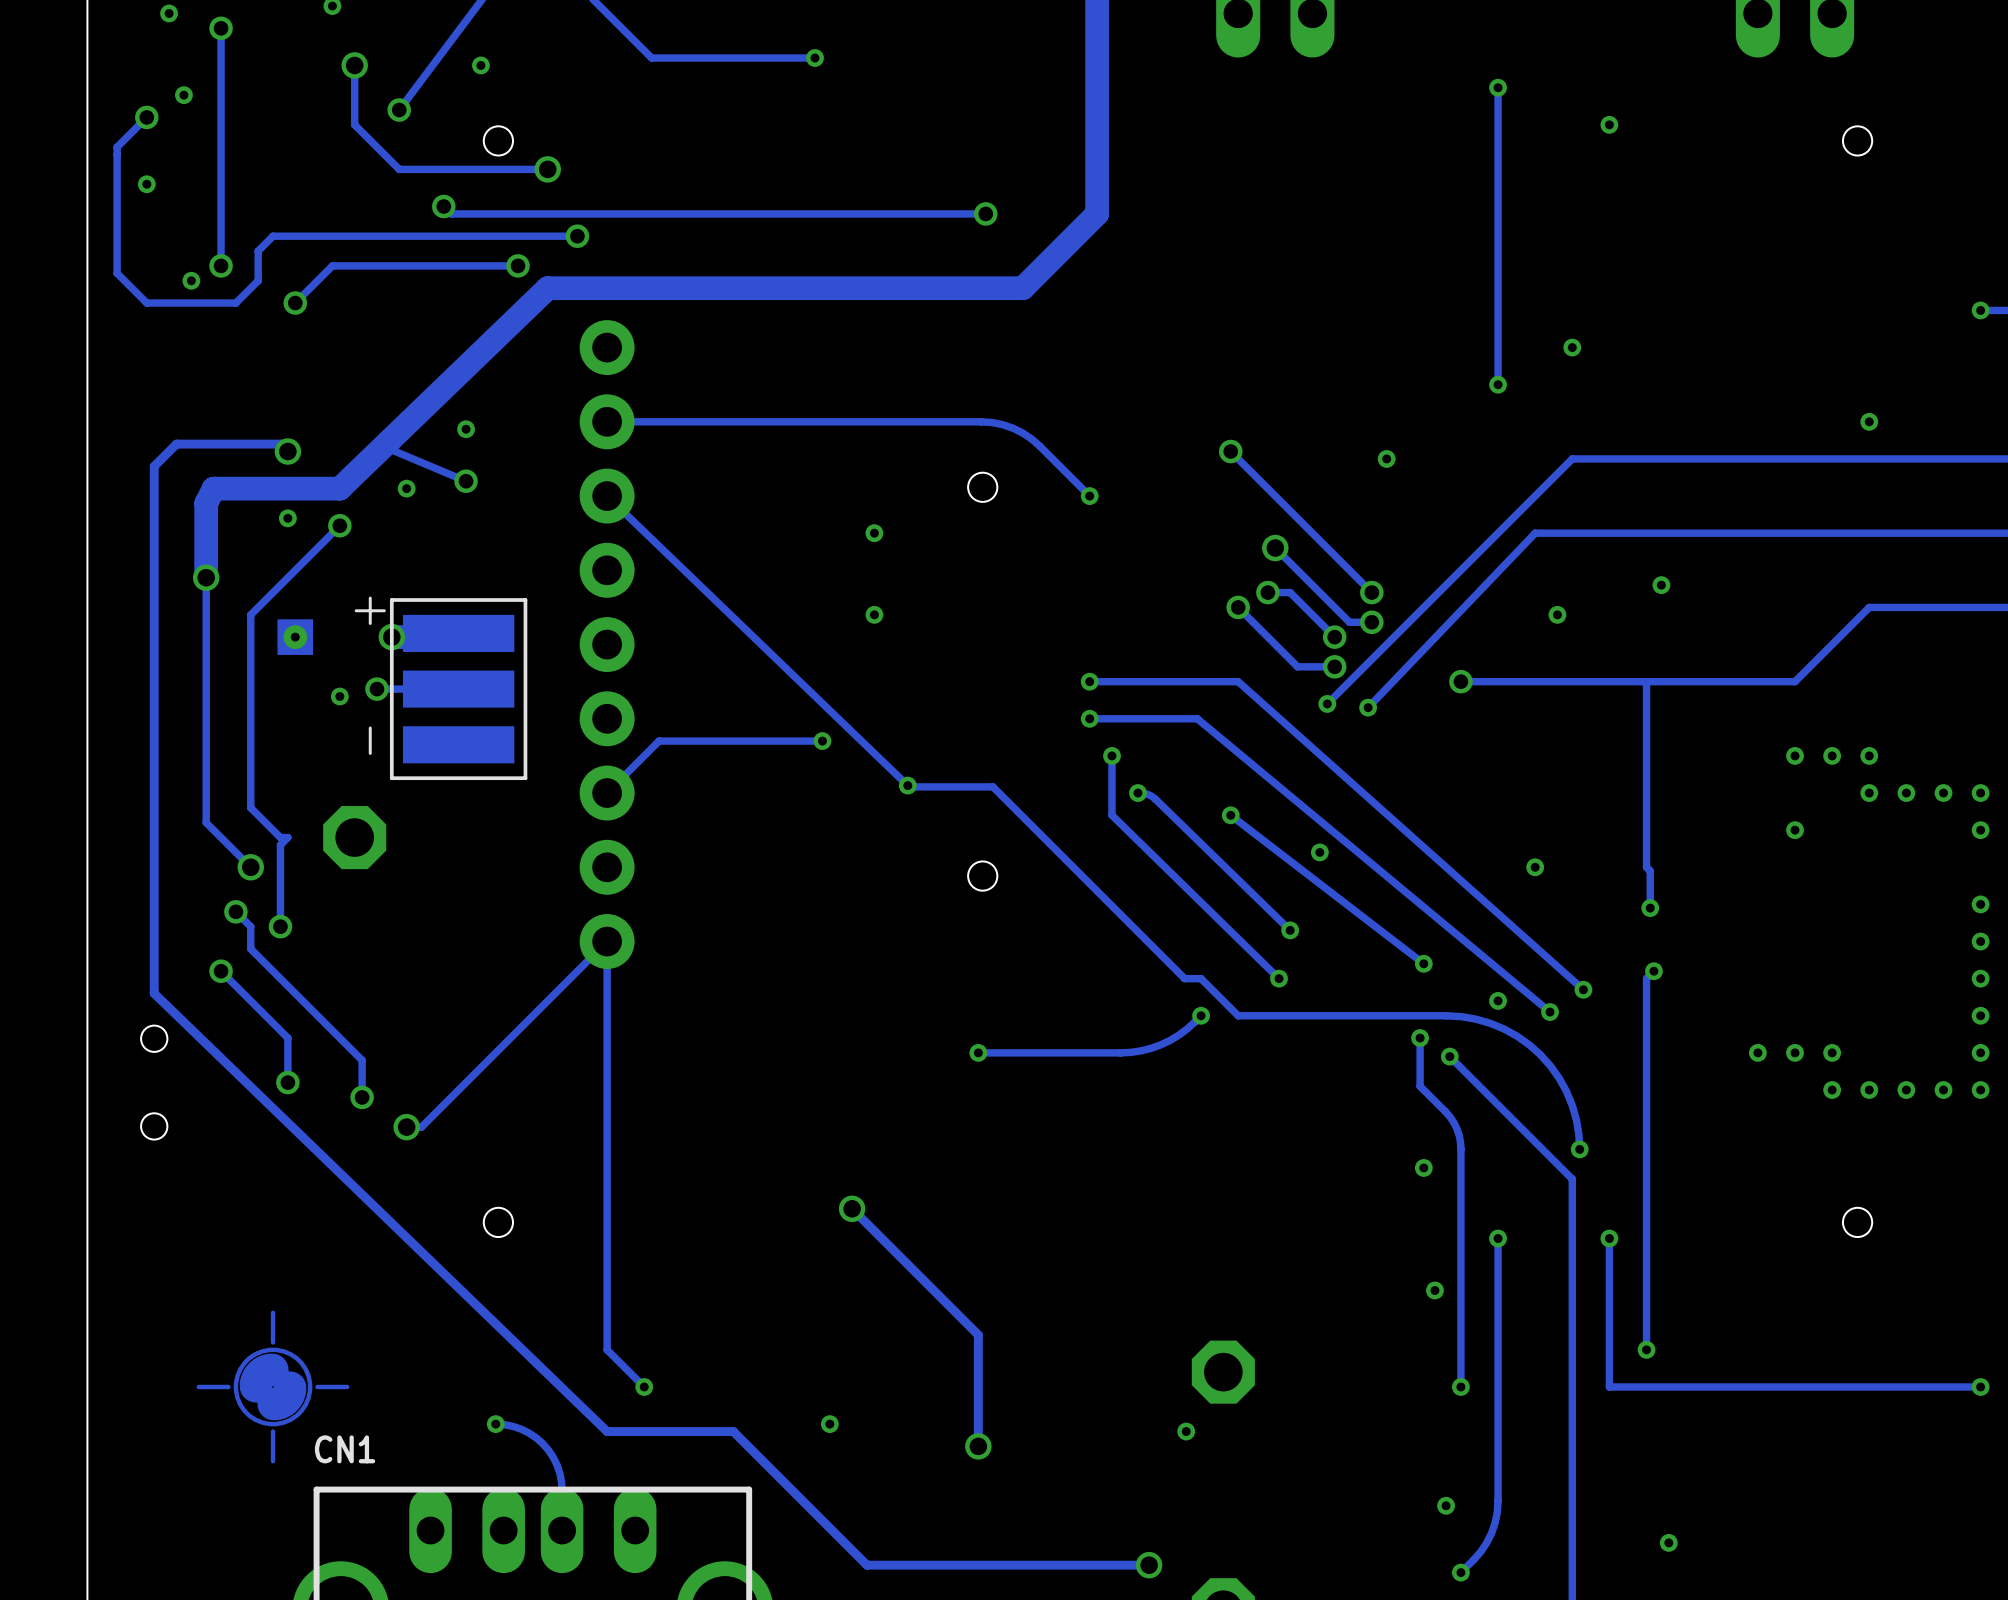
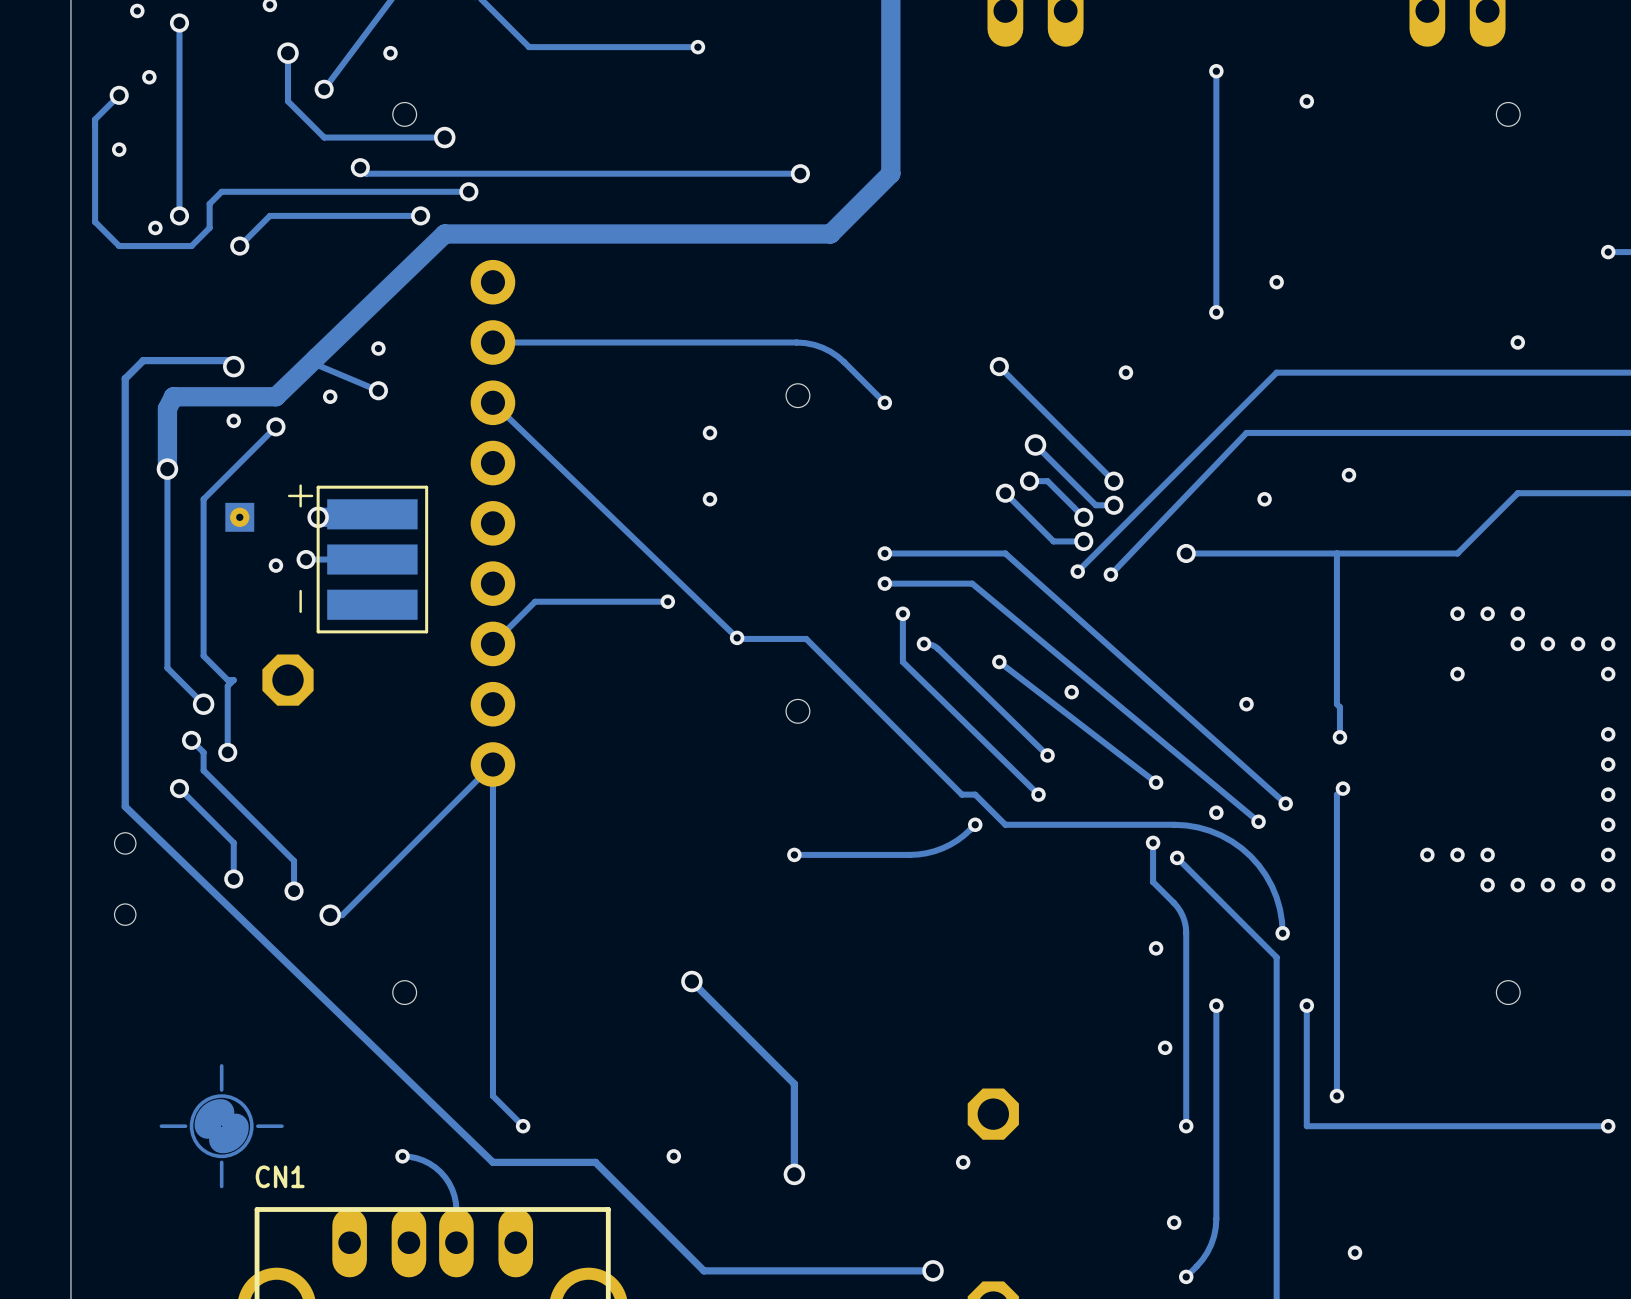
via position: (815, 58) -> (697, 47)
track: none -> (697, 47) (661, 47)

